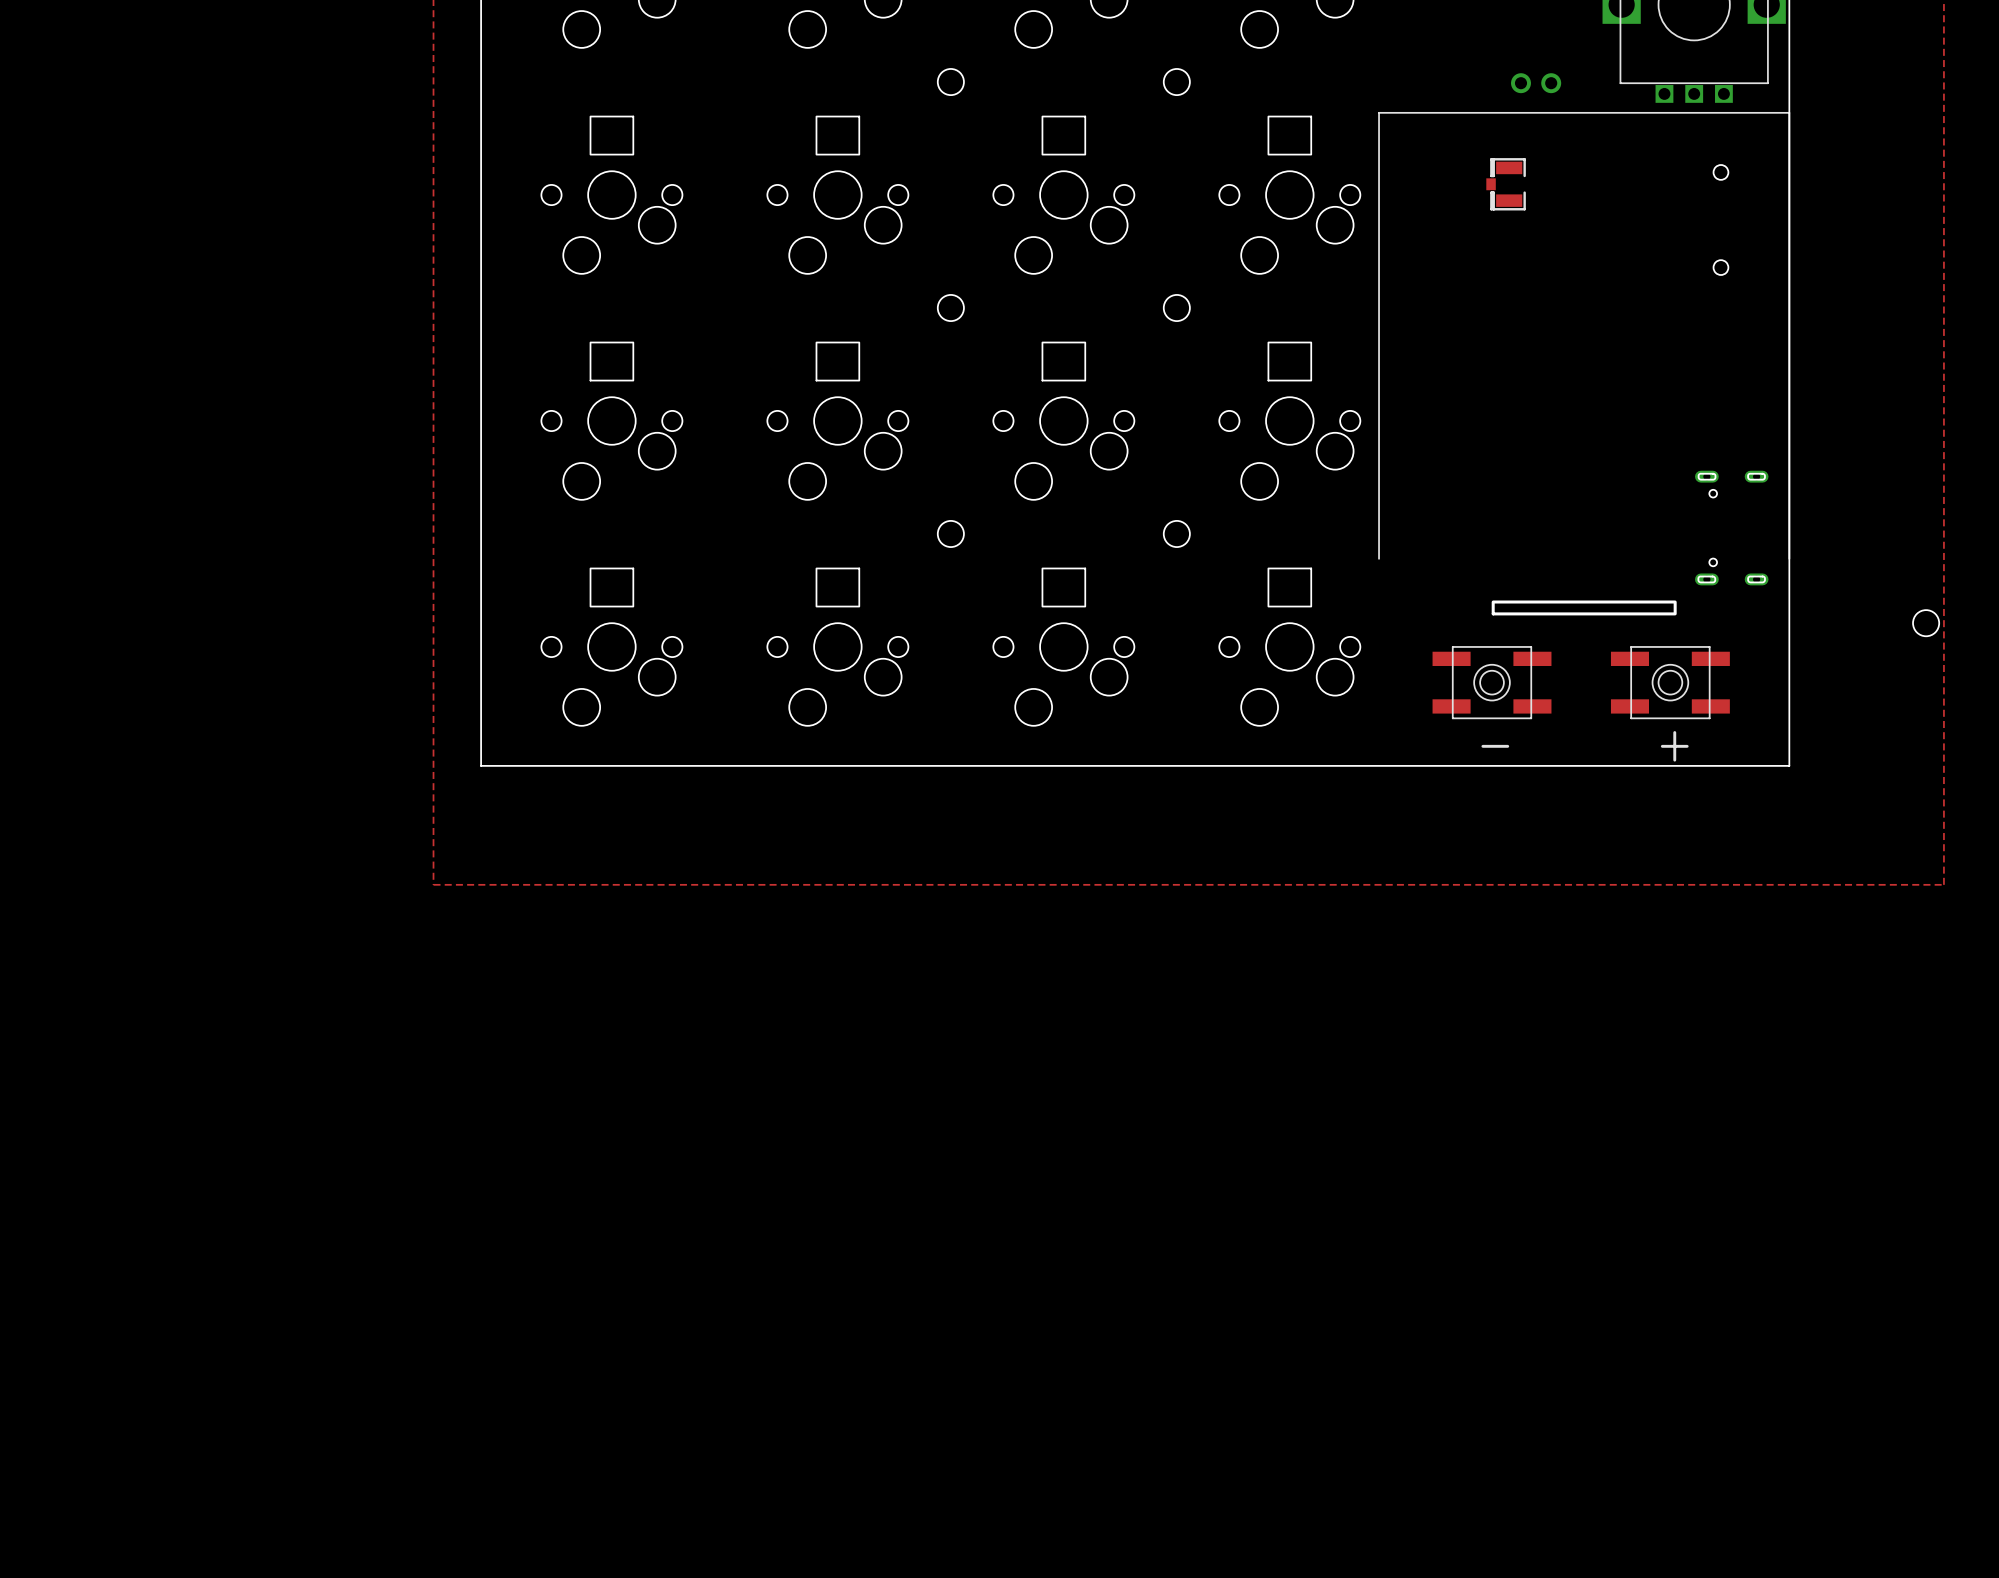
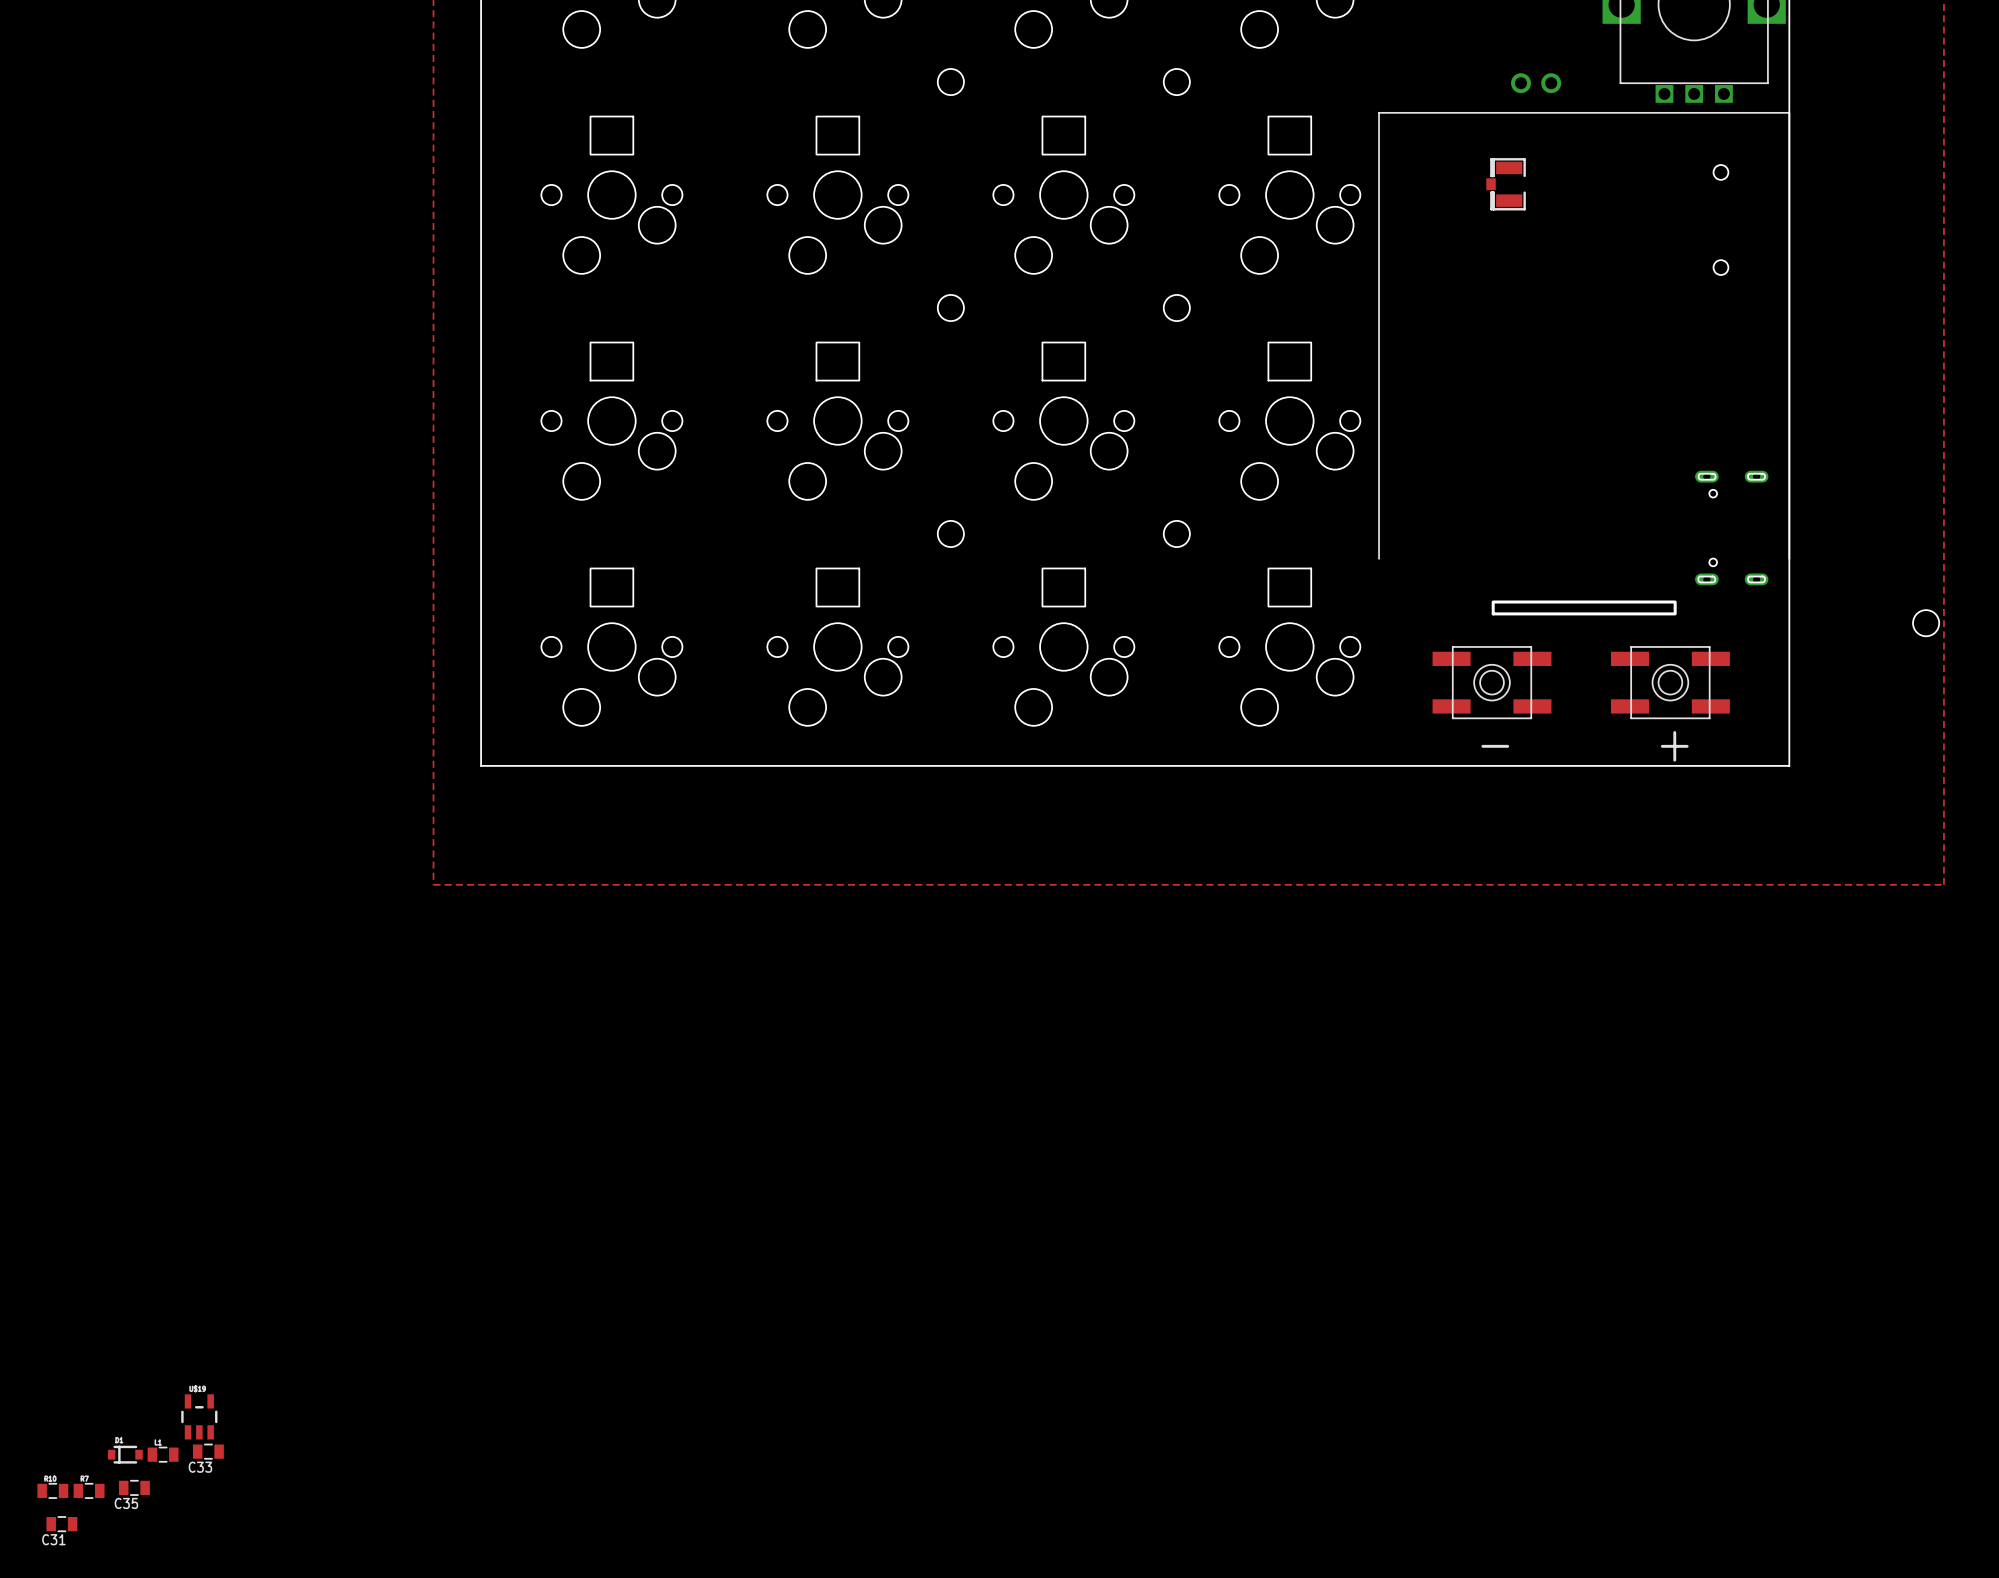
part: none -> (199, 1416)
C33: none -> (208, 1451)
part: none -> (125, 1454)
part: none -> (163, 1454)
C35: none -> (134, 1487)
part: none -> (52, 1490)
part: none -> (89, 1490)
C31: none -> (61, 1524)

